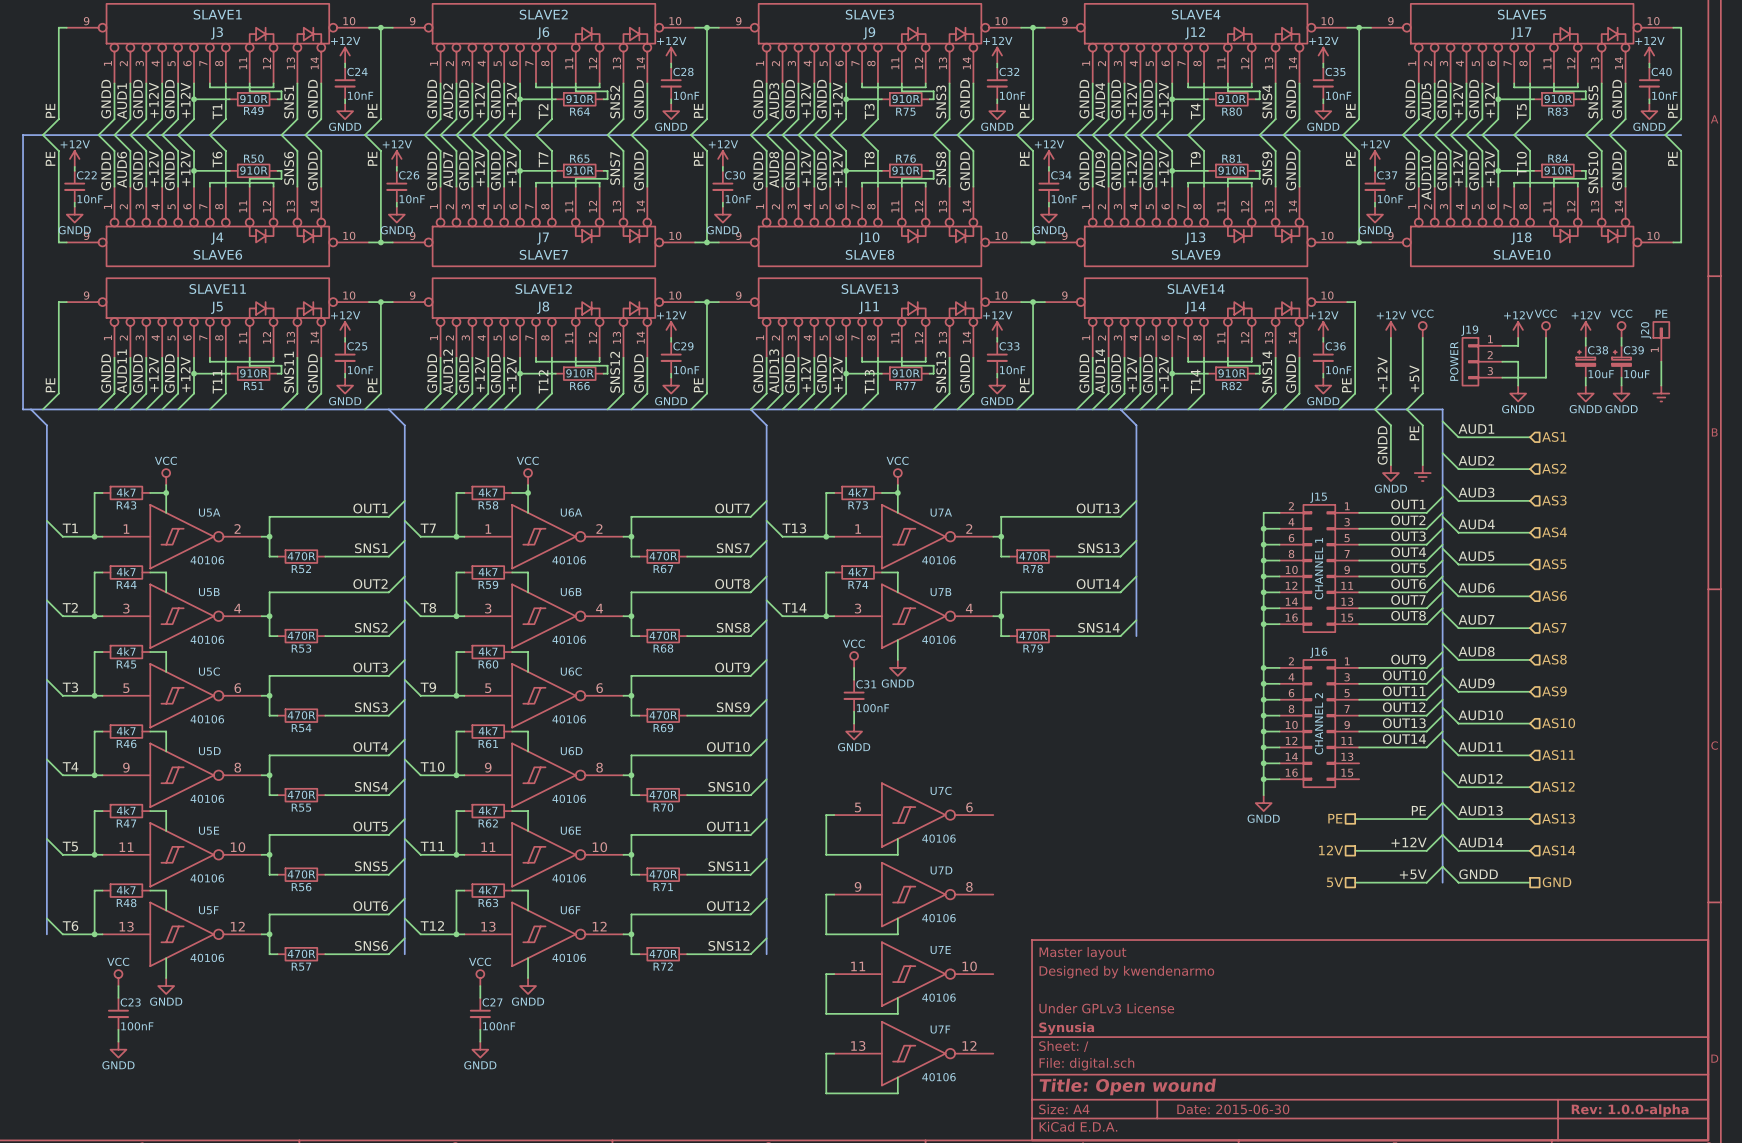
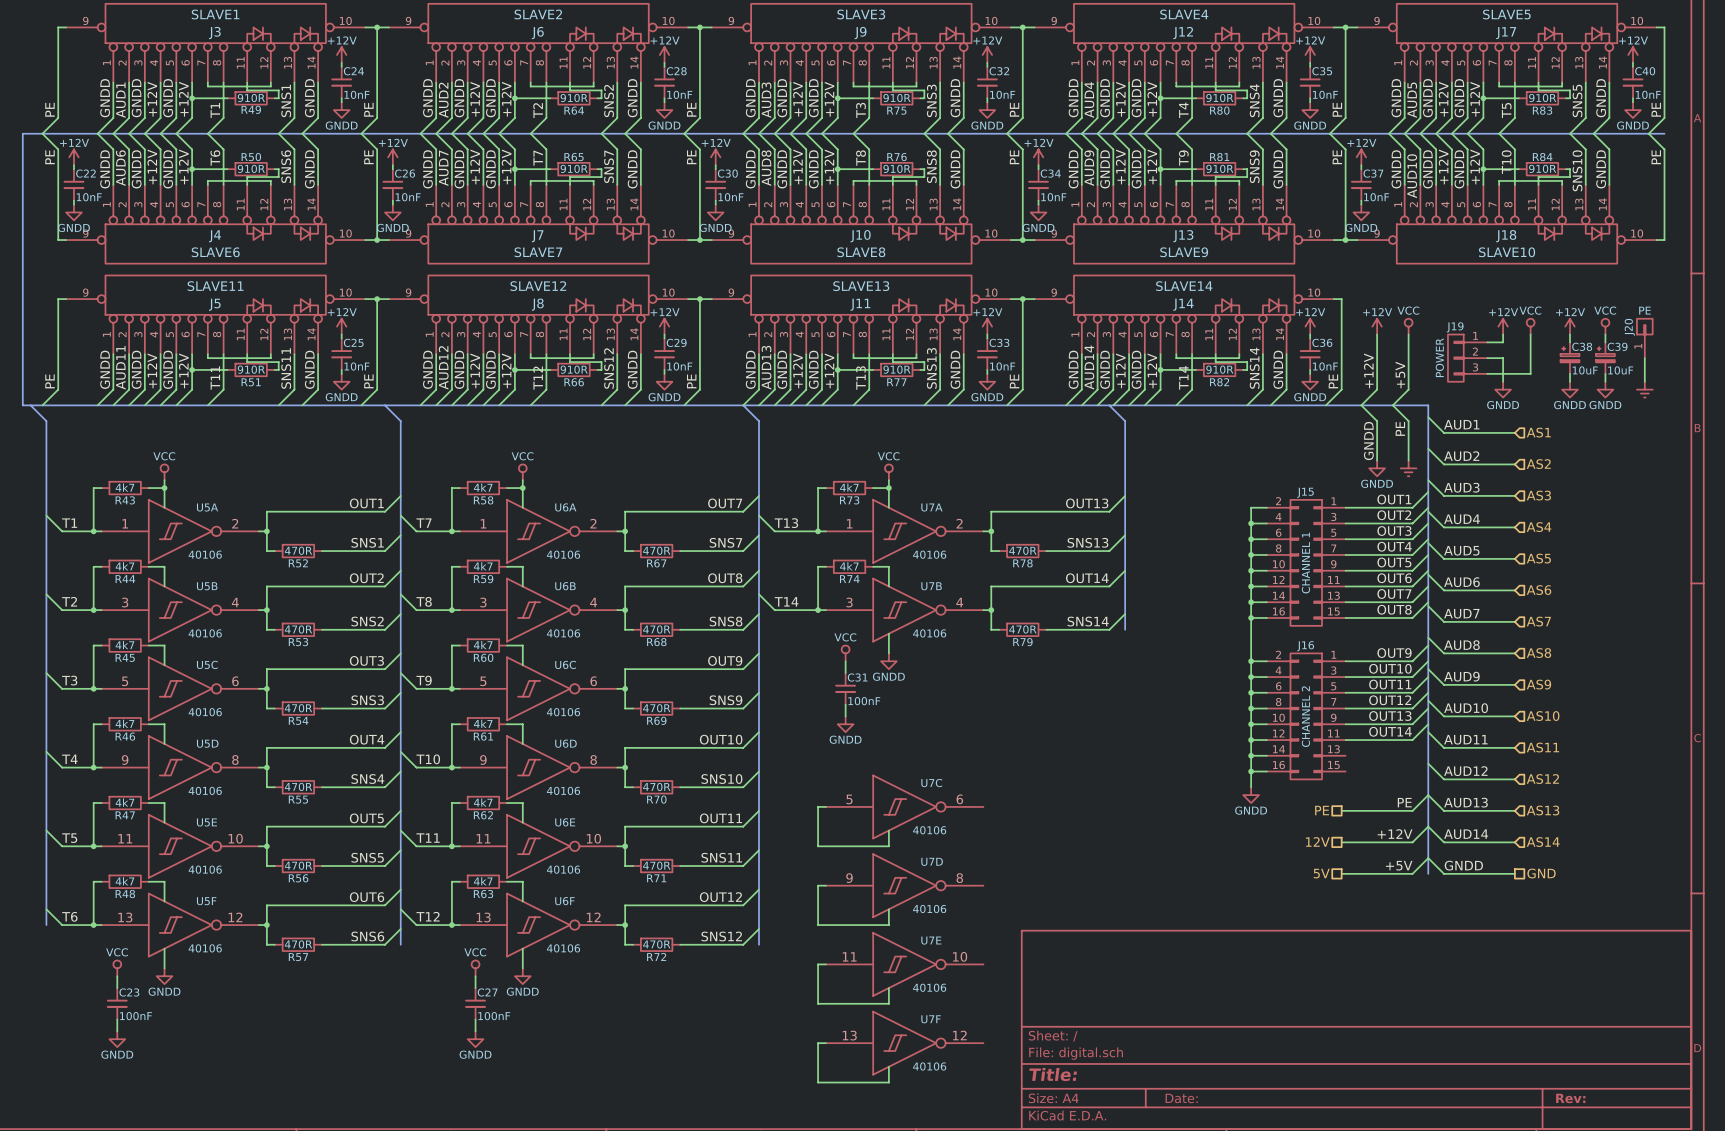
title block: Master layout (1082, 953) -> none
title block: Designed by kwendenarmo (1126, 972) -> none
title block: Under GPLv3 License (1106, 1008) -> none
title block: Synusia (1066, 1028) -> none
title block: Title: Open wound (1127, 1086) -> Title: (1053, 1074)
title block: Date: 2015-06-30 (1233, 1109) -> Date: (1181, 1098)
title block: Rev: 1.0.0-alpha (1630, 1110) -> Rev: (1570, 1098)

